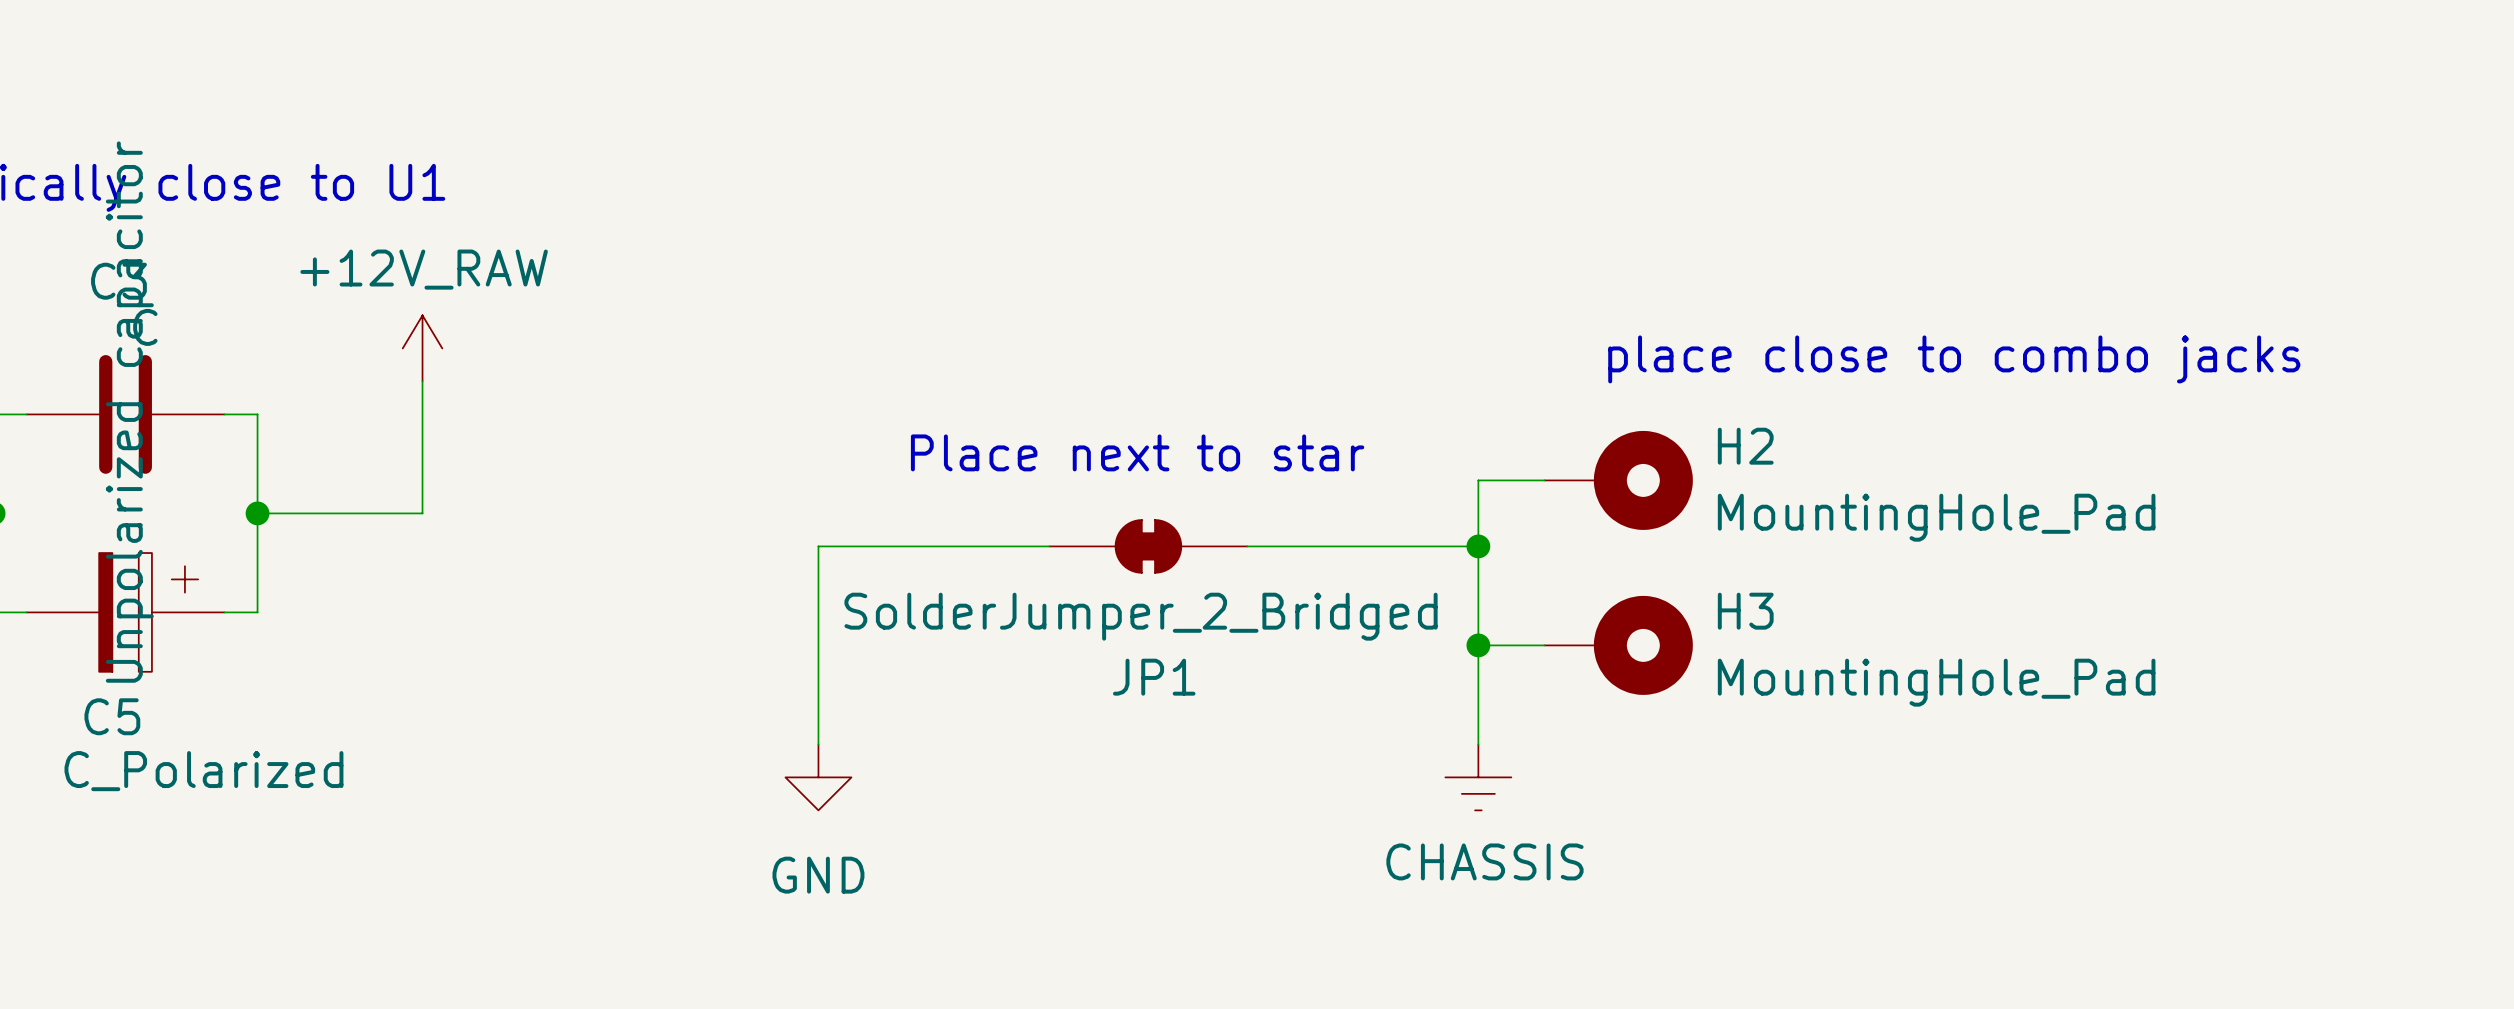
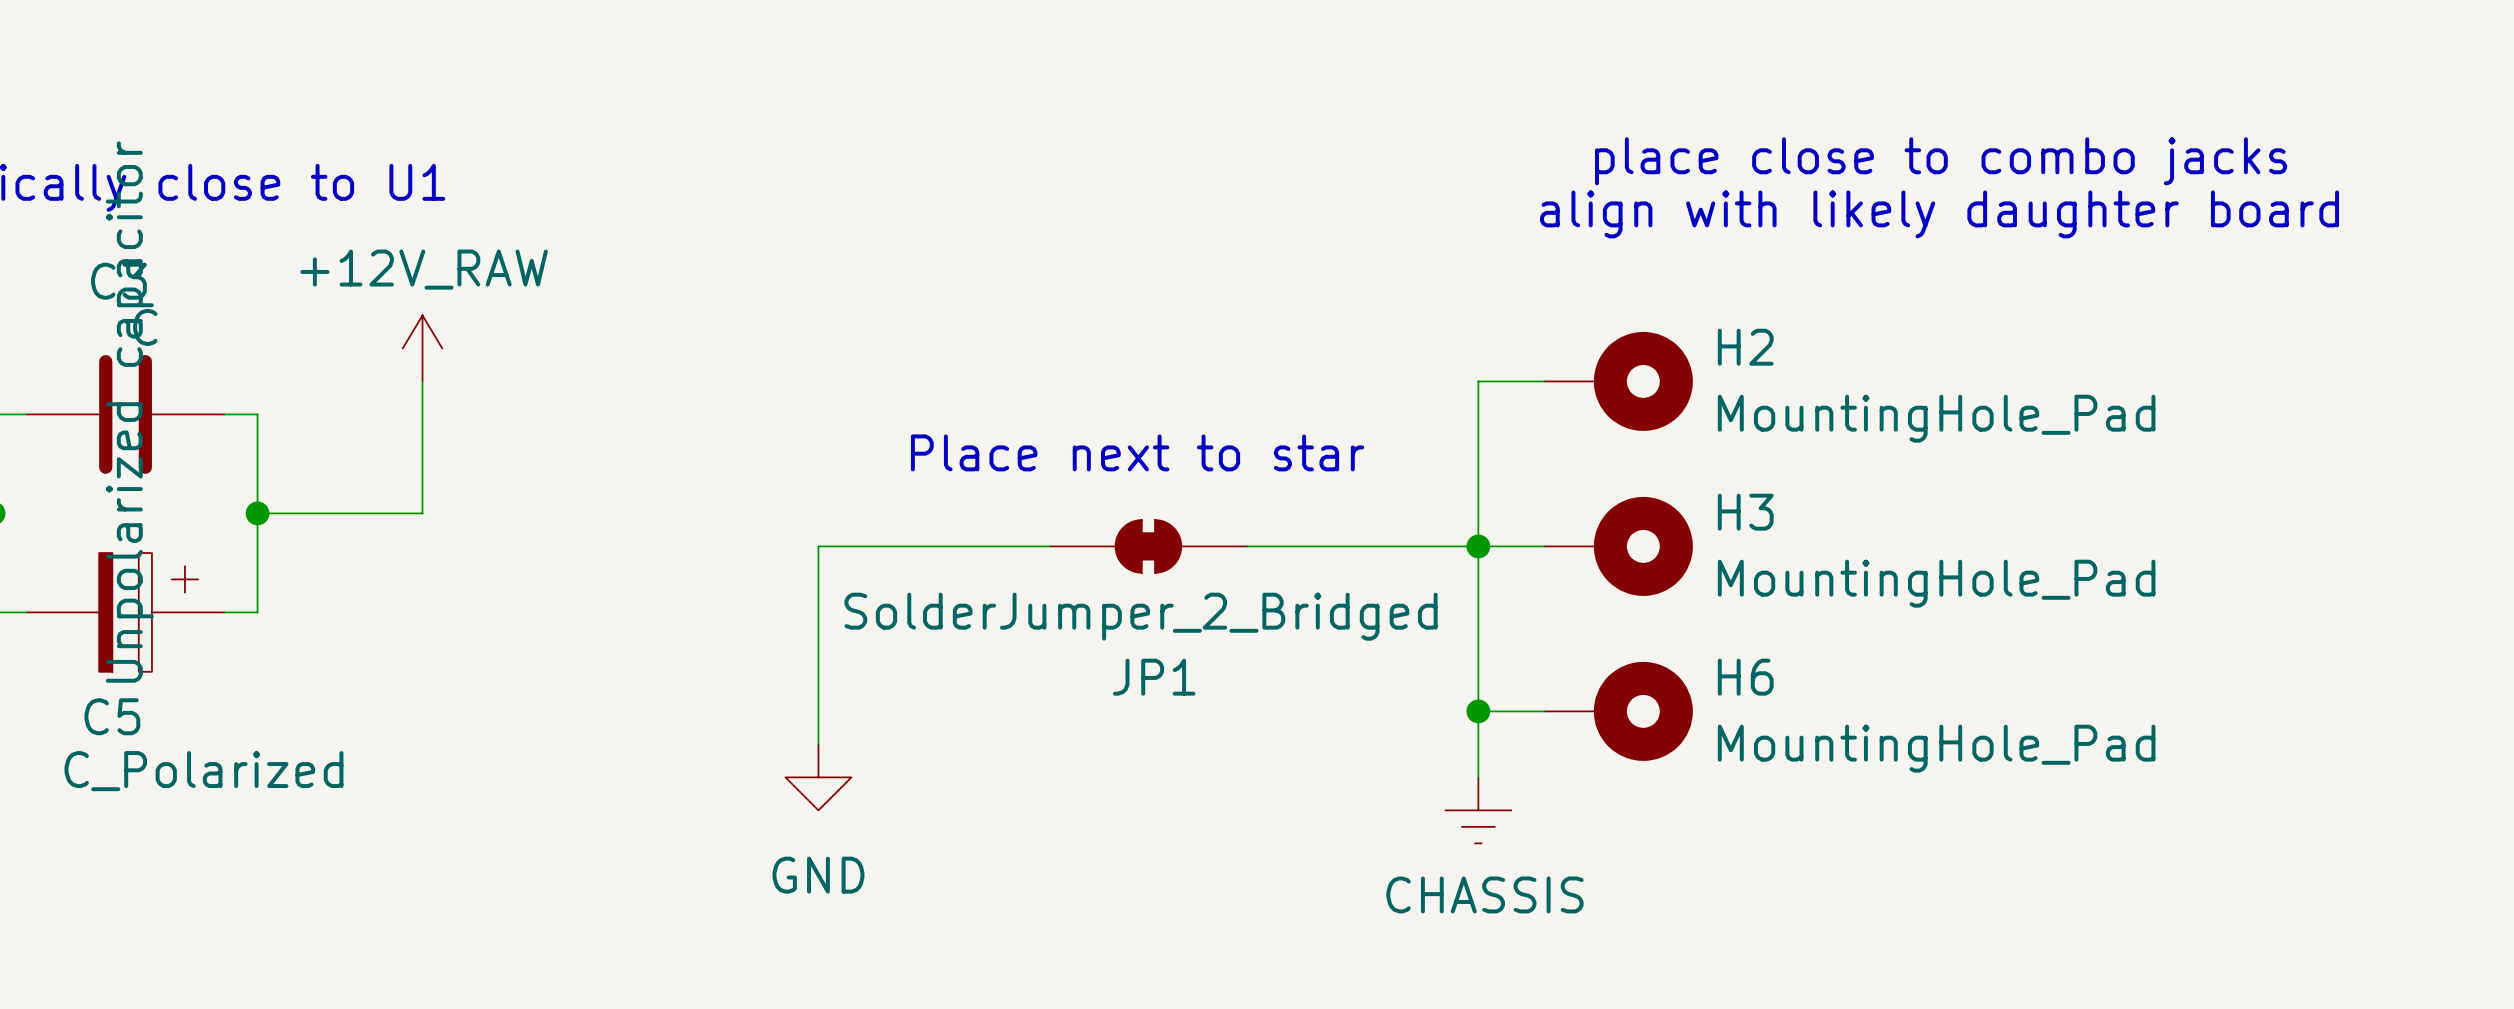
text: none -> align with likely daughter board (1939, 214)
text position: place close to combo jacks (1954, 359) -> place close to combo jacks (1941, 161)
wire: (1478, 480) (1544, 480) -> (1478, 480) (1478, 381) (1544, 381)
H2 position: (1618, 480) -> (1618, 381)
wire: none -> (1478, 546) (1544, 546)
wire: (1478, 645) (1544, 645) -> (1478, 711) (1544, 711)
junction position: (1478, 645) -> (1478, 711)
H3 position: (1618, 645) -> (1618, 546)
H6: none -> MountingHole_Pad (1618, 711)
power symbol position: CHASSIS (1478, 777) -> CHASSIS (1478, 810)

